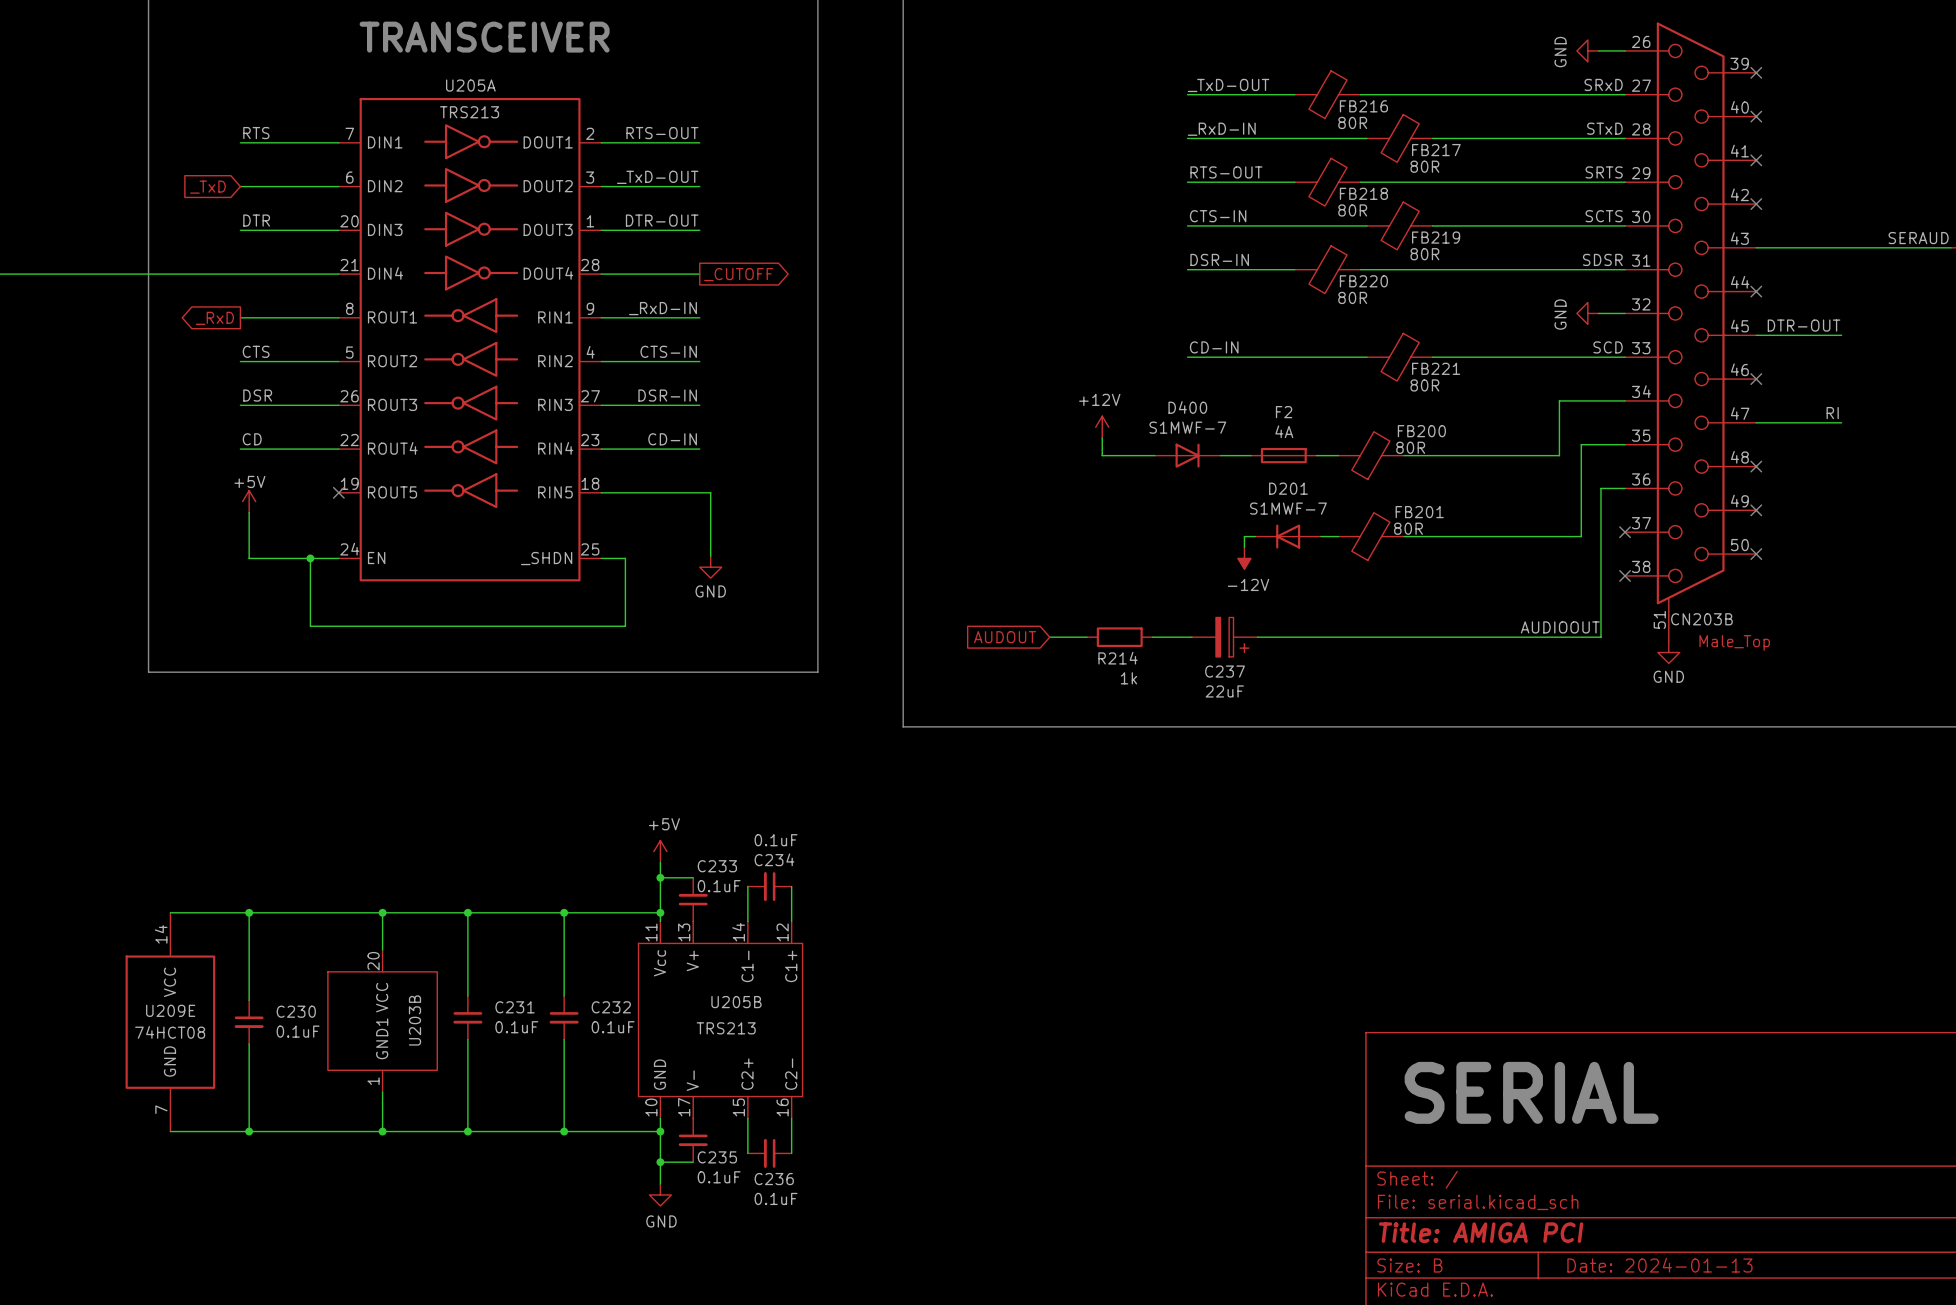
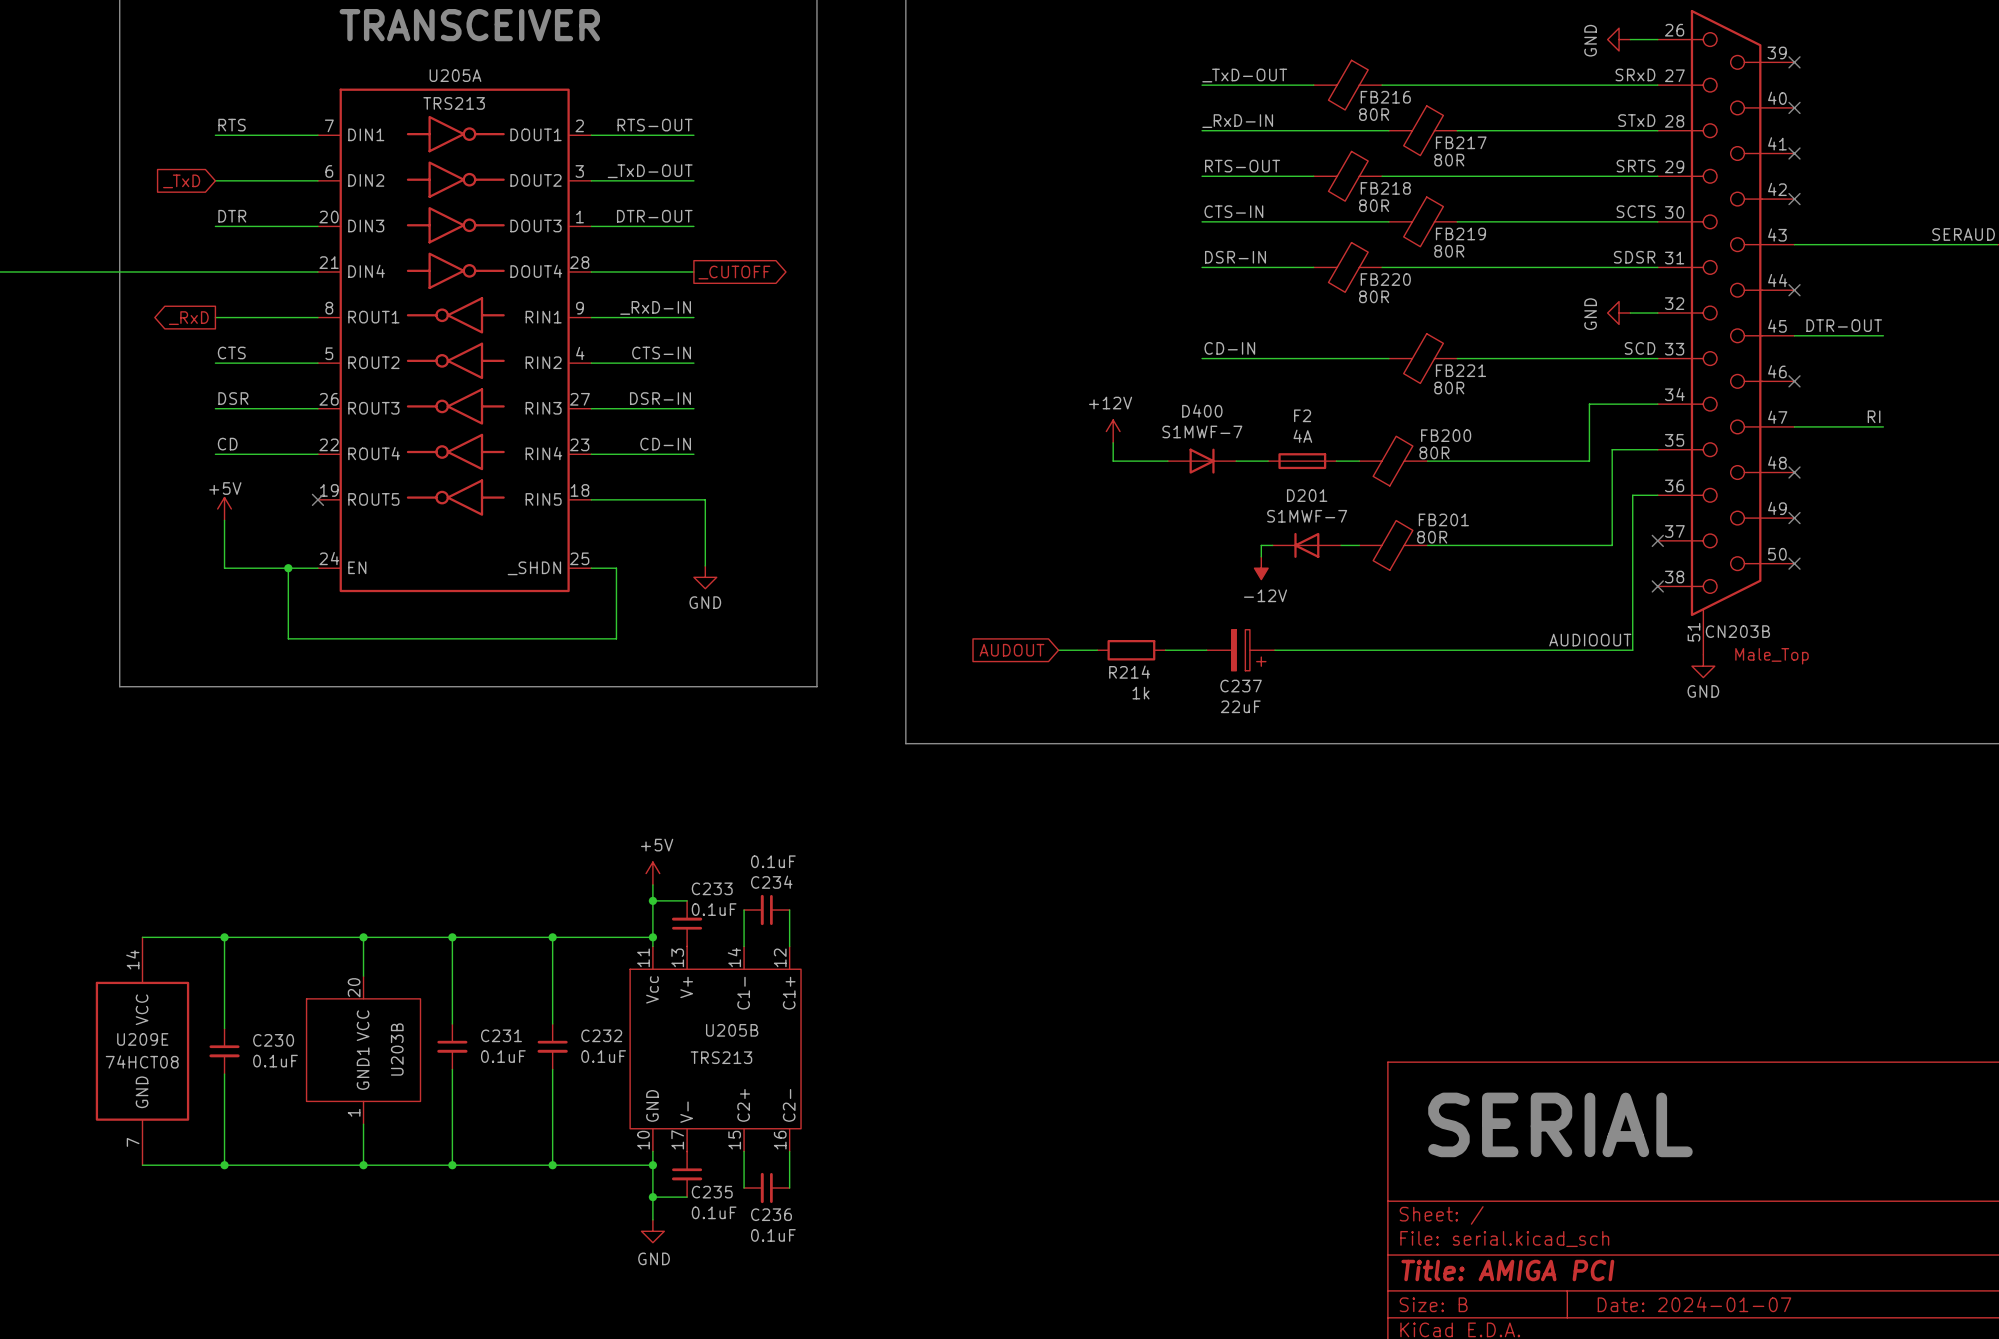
title block: Date: 2024-01-13 (1659, 1265) -> Date: 2024-01-07 (1694, 1304)

